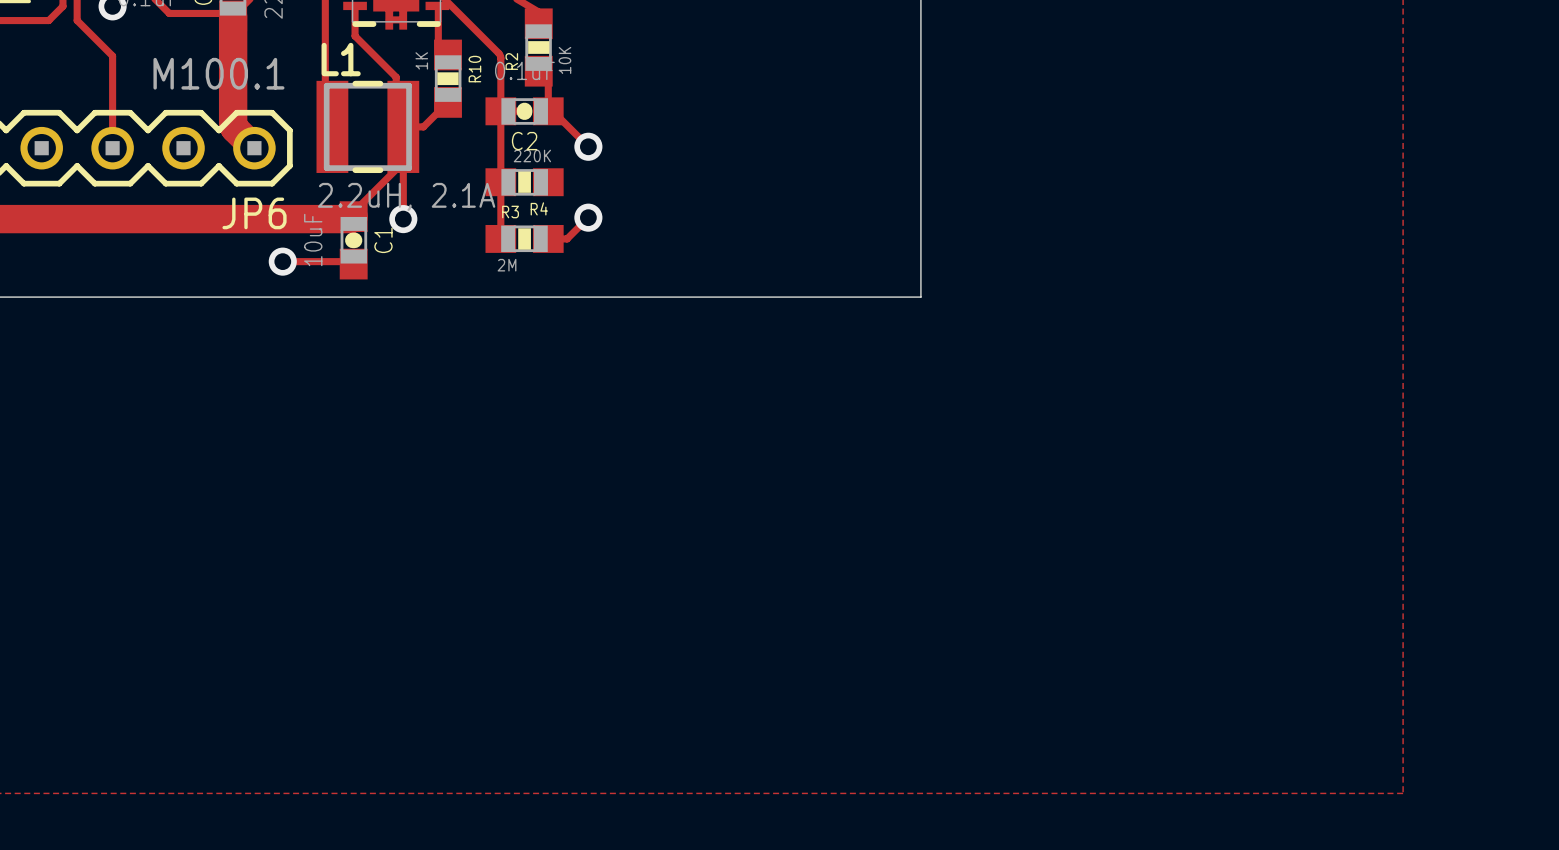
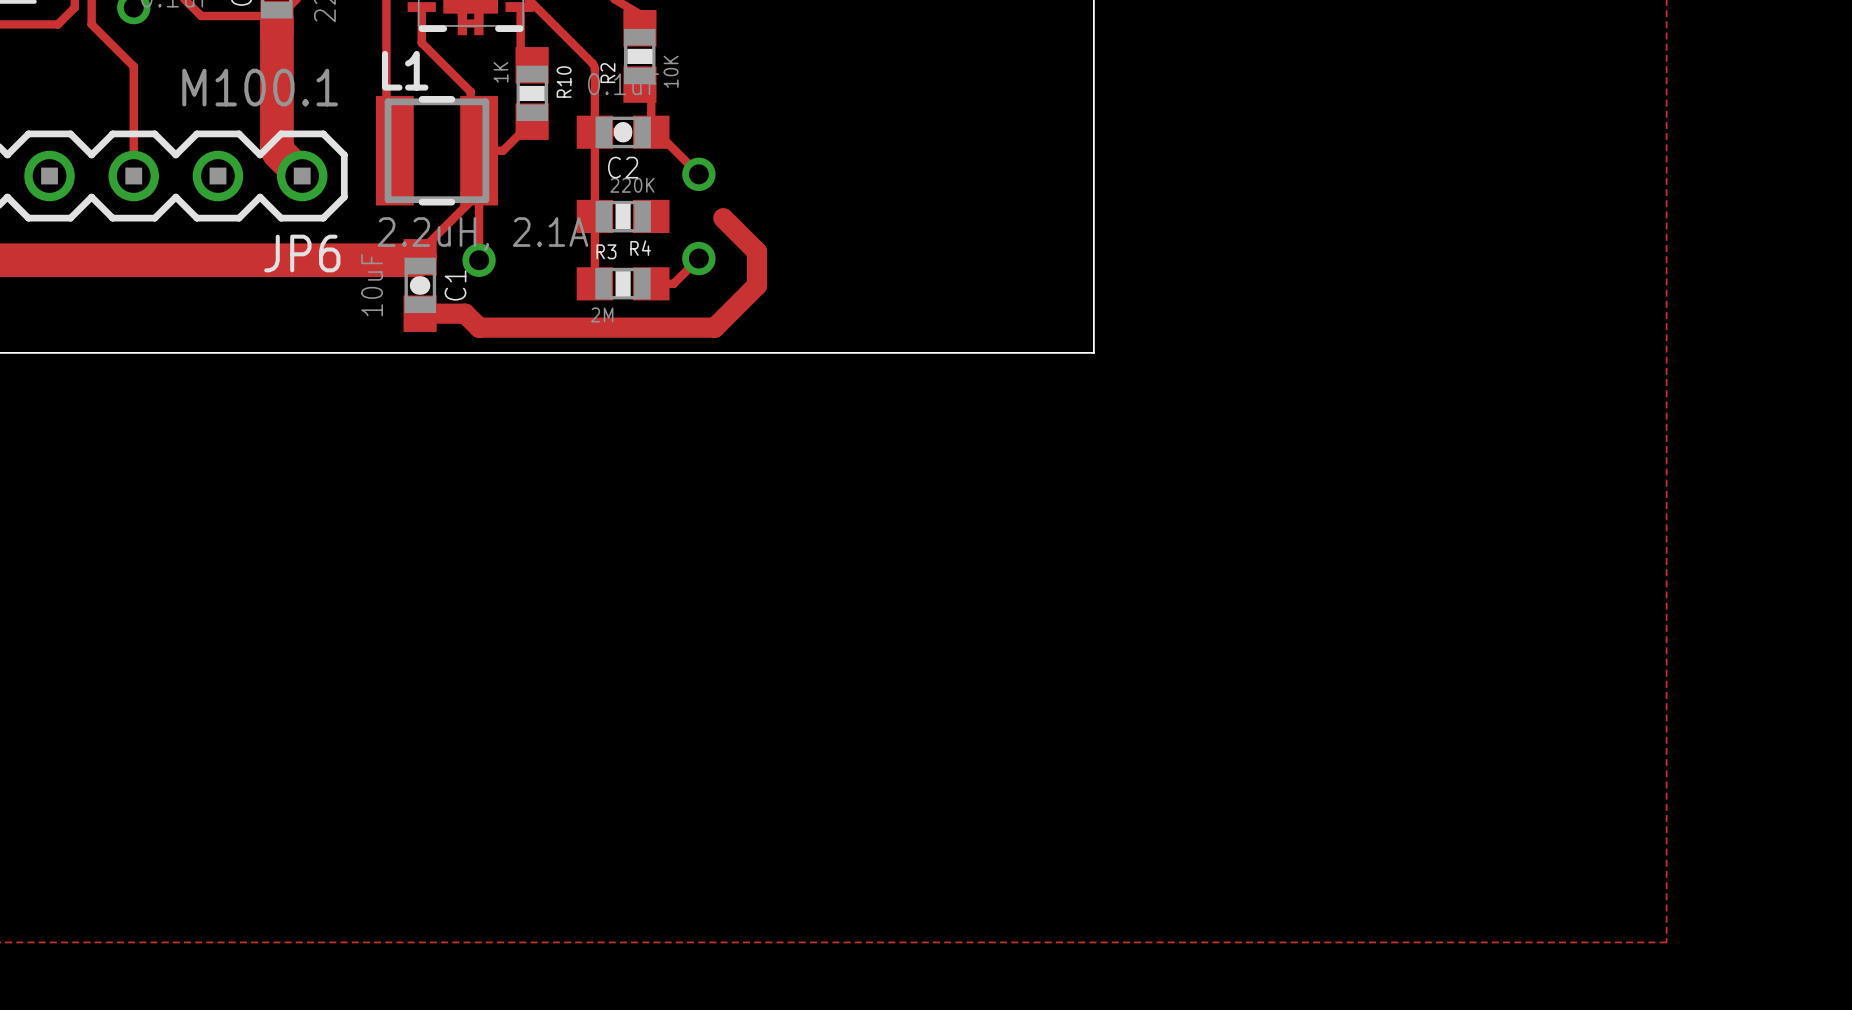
track: (282, 261) (351, 261) (353, 264) -> (723, 218) (757, 251) (757, 285) (714, 327) (479, 327) (465, 313) (420, 313)
via: (282, 261) -> none

